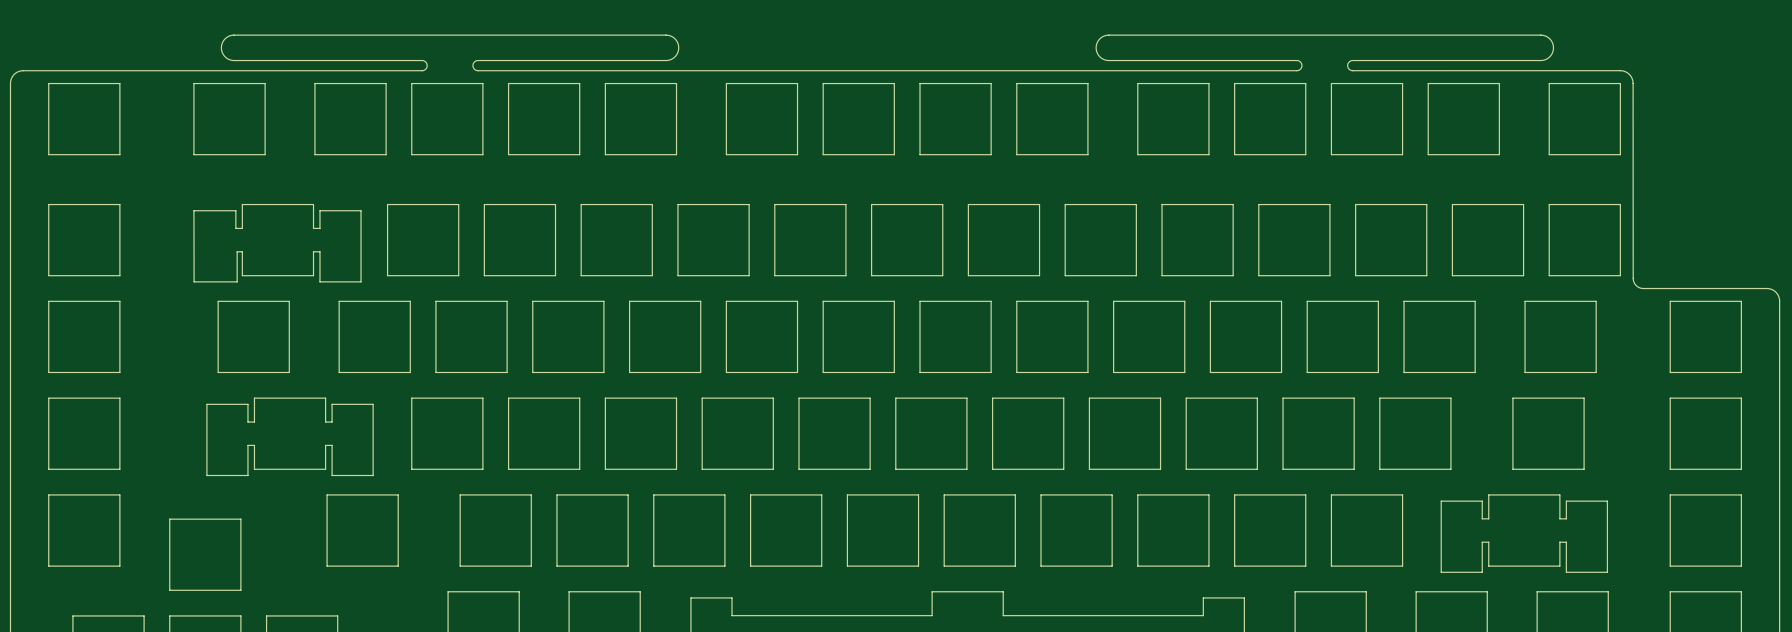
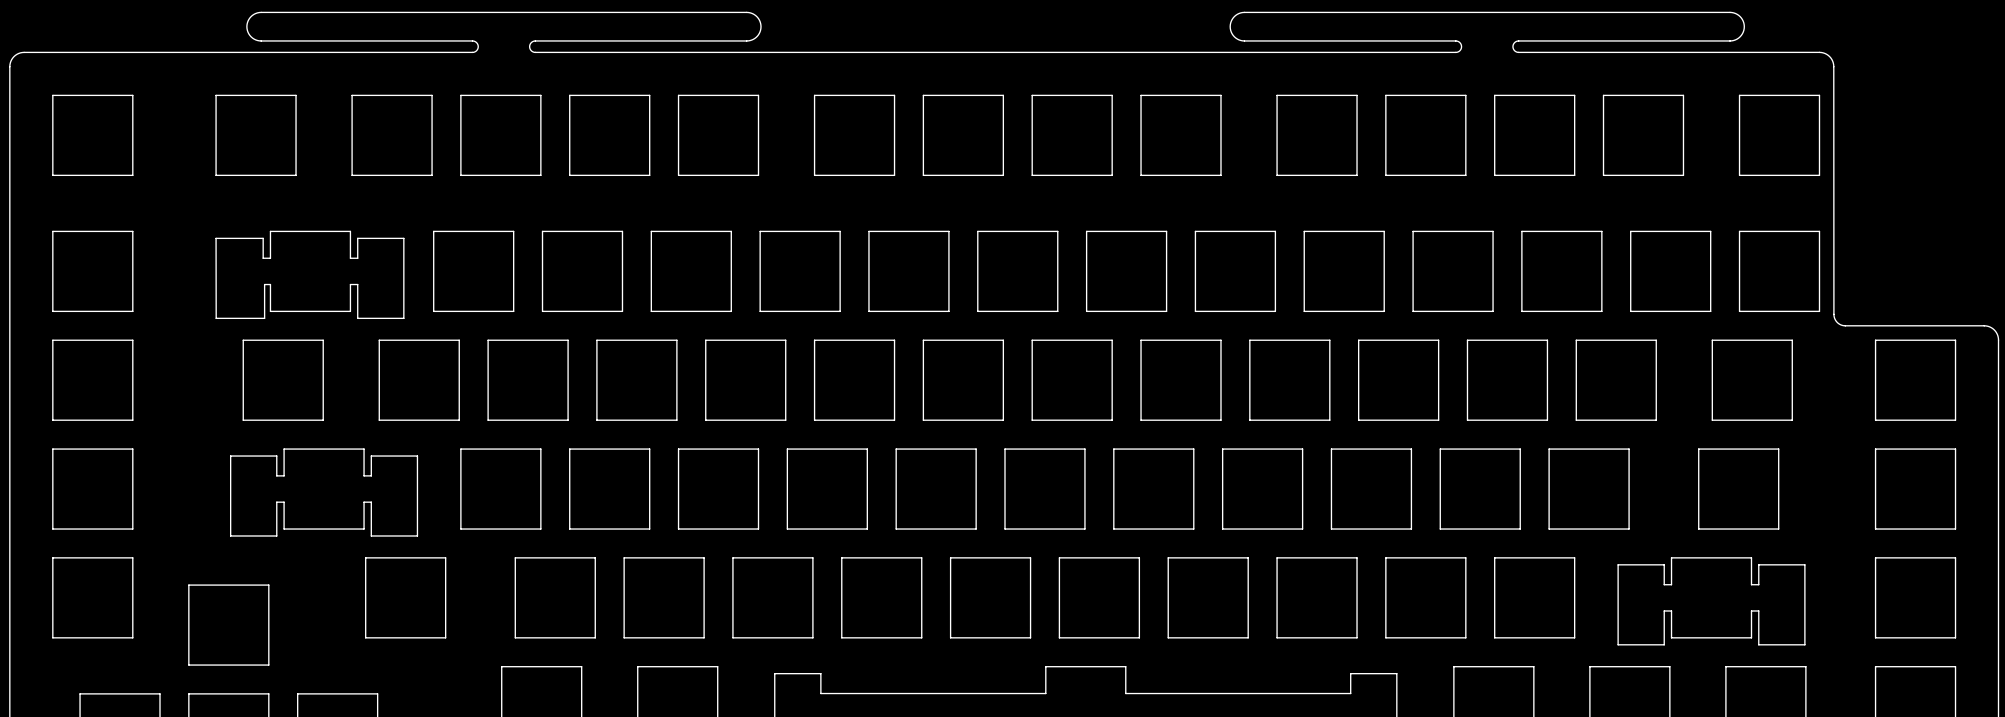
board edge: (234, 35) (225, 38) (221, 47) (225, 56) (232, 60) (422, 60) (425, 62) (427, 66) (422, 70) (23, 70) (14, 74) (10, 83) -> (472, 40) (476, 42) (478, 46) (476, 50) (472, 52) (22, 52) (15, 55) (10, 63) (9, 95)
board edge: (478, 35) (422, 35) -> none
board edge: none -> (746, 40) (756, 37) (761, 26) (757, 17) (746, 12) (261, 12) (251, 16) (246, 26) (251, 36) (261, 40)
board edge: (1108, 35) (1101, 37) (1096, 46) (1098, 55) (1107, 60) (1296, 60) (1300, 62) (1301, 66) (1296, 70) (478, 70) (472, 66) (474, 62) (478, 60) (667, 60) (675, 56) (678, 47) (675, 39) (666, 35) -> (1244, 40) (1234, 36) (1230, 26) (1234, 16) (1244, 12) (1730, 12) (1740, 16) (1744, 26) (1740, 36) (1730, 40)
board edge: (1352, 35) (1296, 35) -> (535, 40) (531, 42) (529, 46) (531, 50) (535, 52) (1455, 52) (1459, 50) (1461, 46) (1460, 42) (1455, 40)
board edge: (1540, 35) (1549, 38) (1553, 46) (1550, 56) (1542, 60) (1352, 60) (1348, 62) (1347, 66) (1352, 70) (1620, 70) (1628, 73) (1633, 83) (1633, 278) -> (1518, 40) (1514, 42) (1512, 46) (1514, 50) (1518, 52) (1819, 52) (1828, 55) (1833, 66) (1833, 314)

